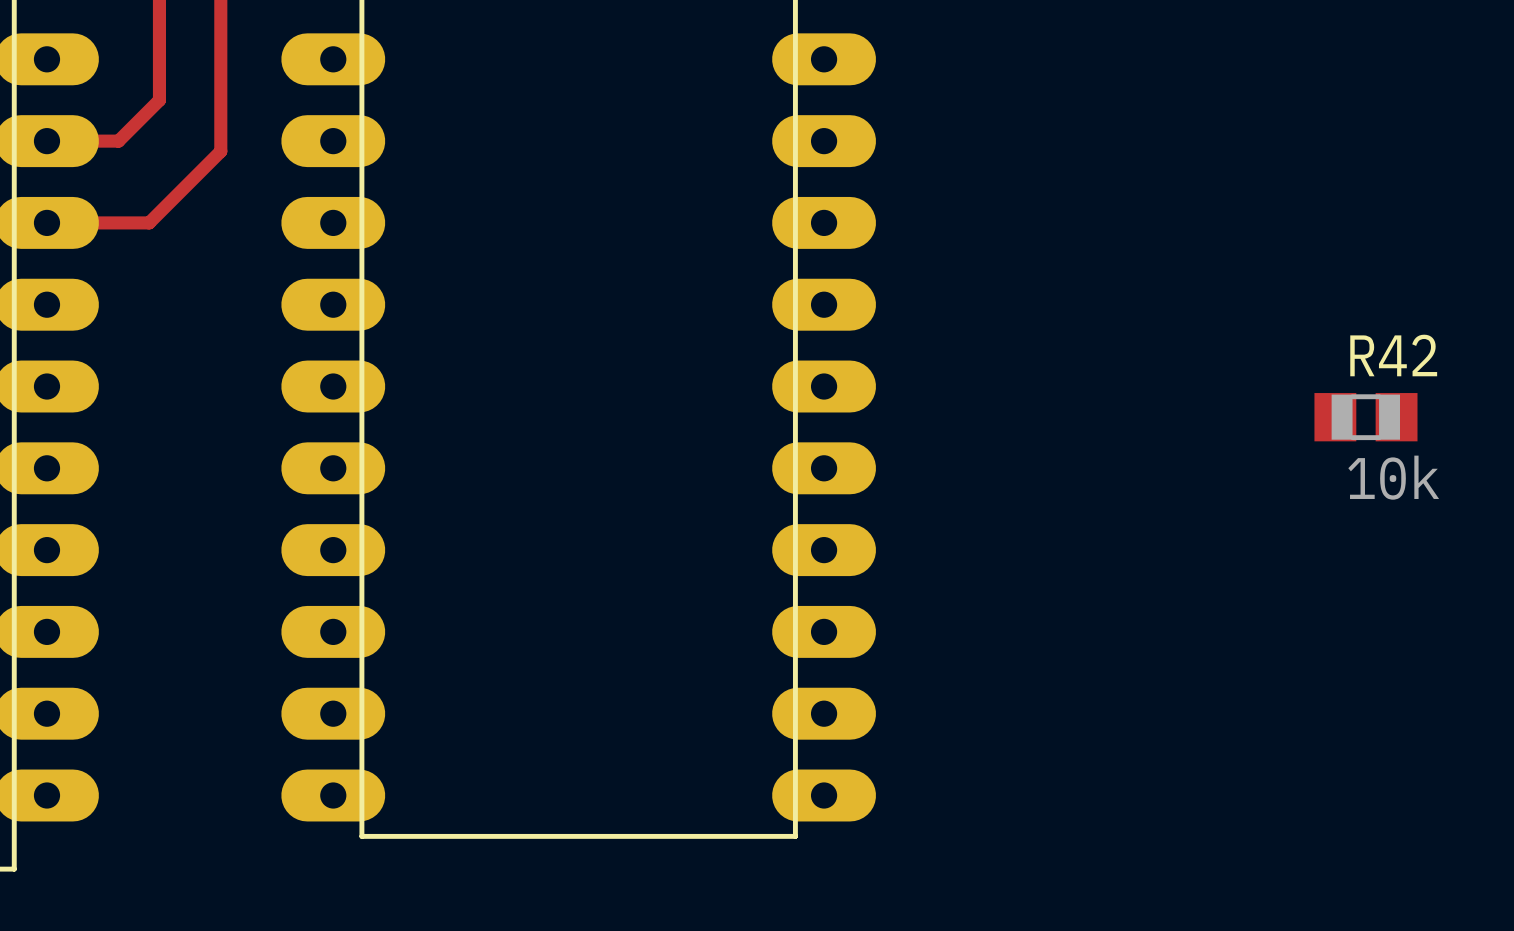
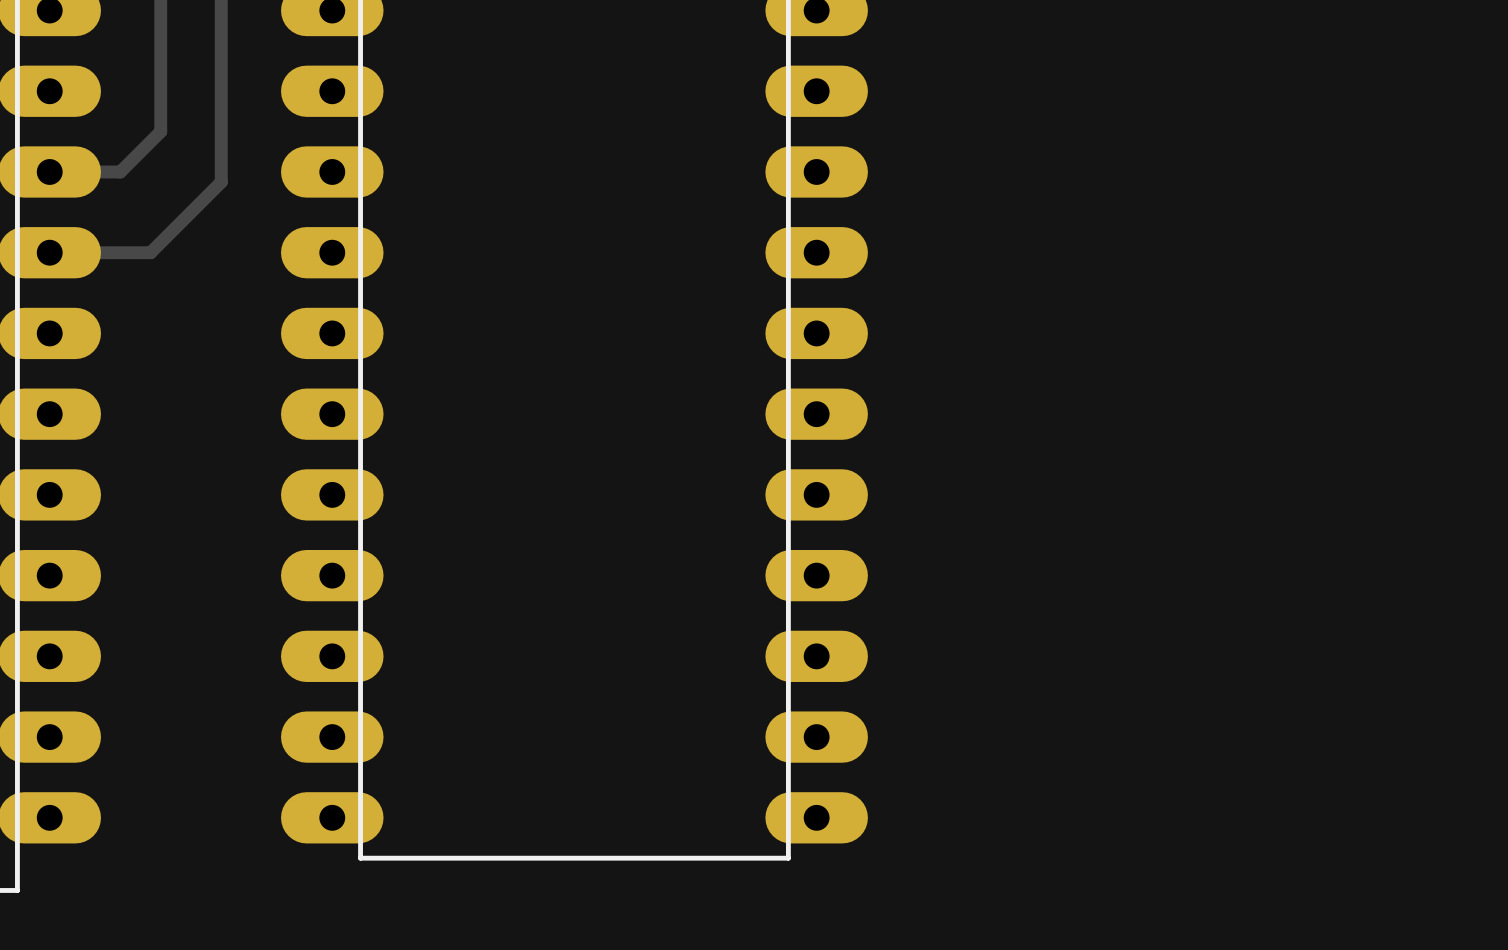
R42: 10k (1365, 417) -> none

